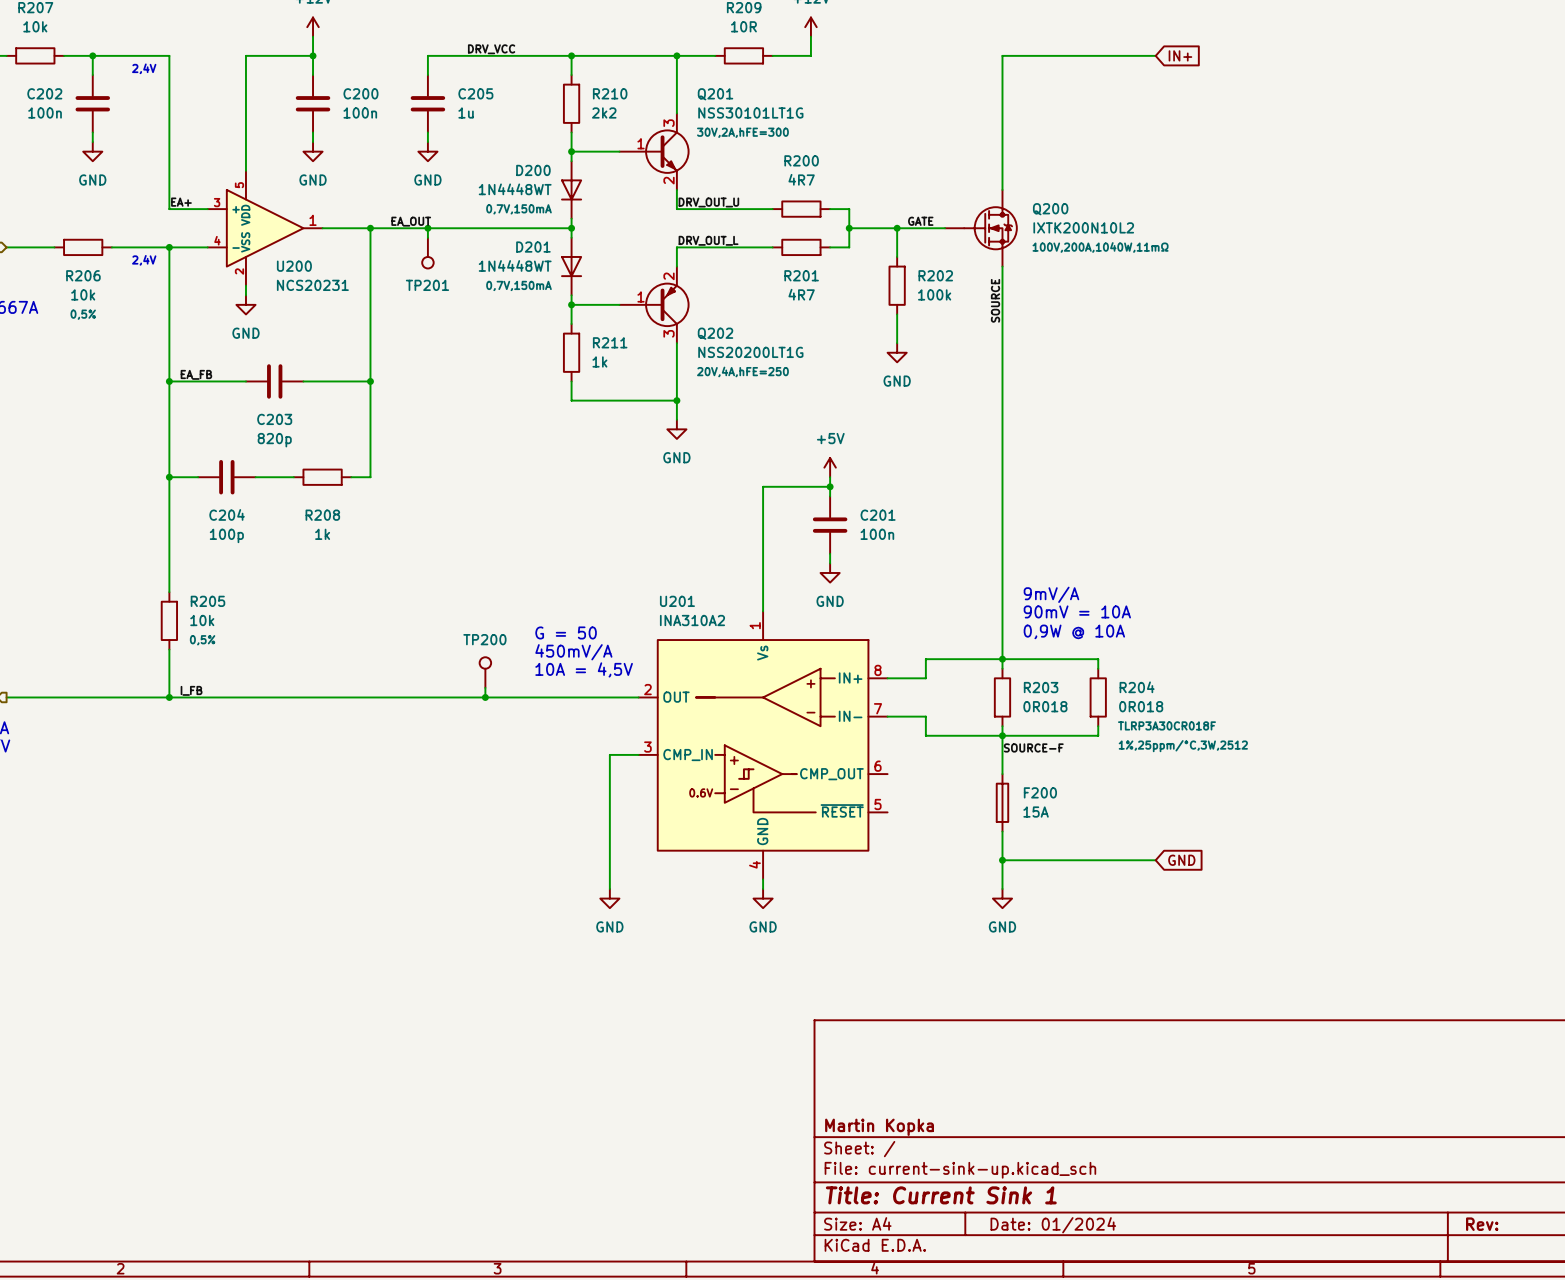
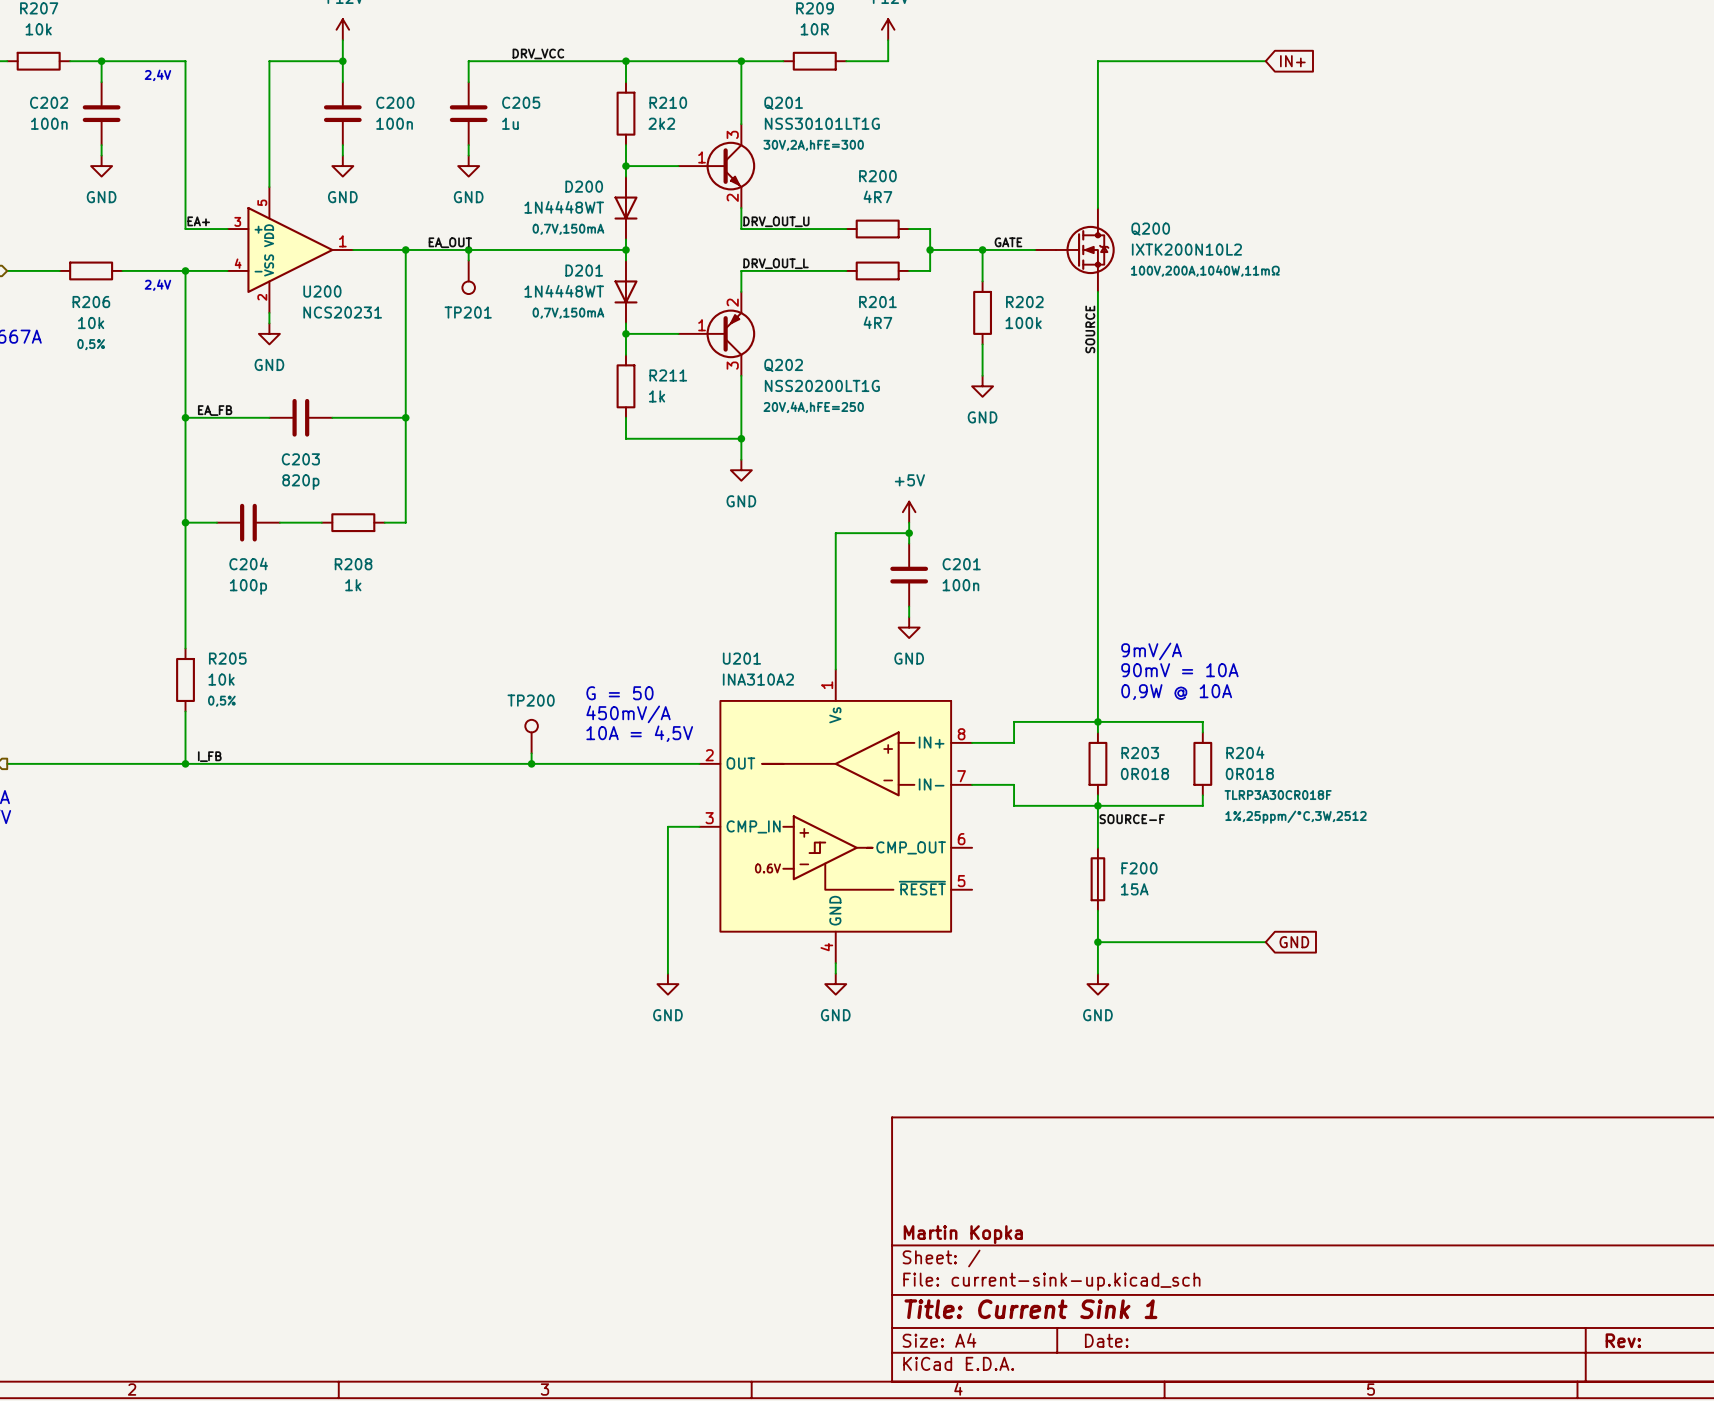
title block: Date: 01/2024 (1053, 1225) -> Date: (1106, 1340)

